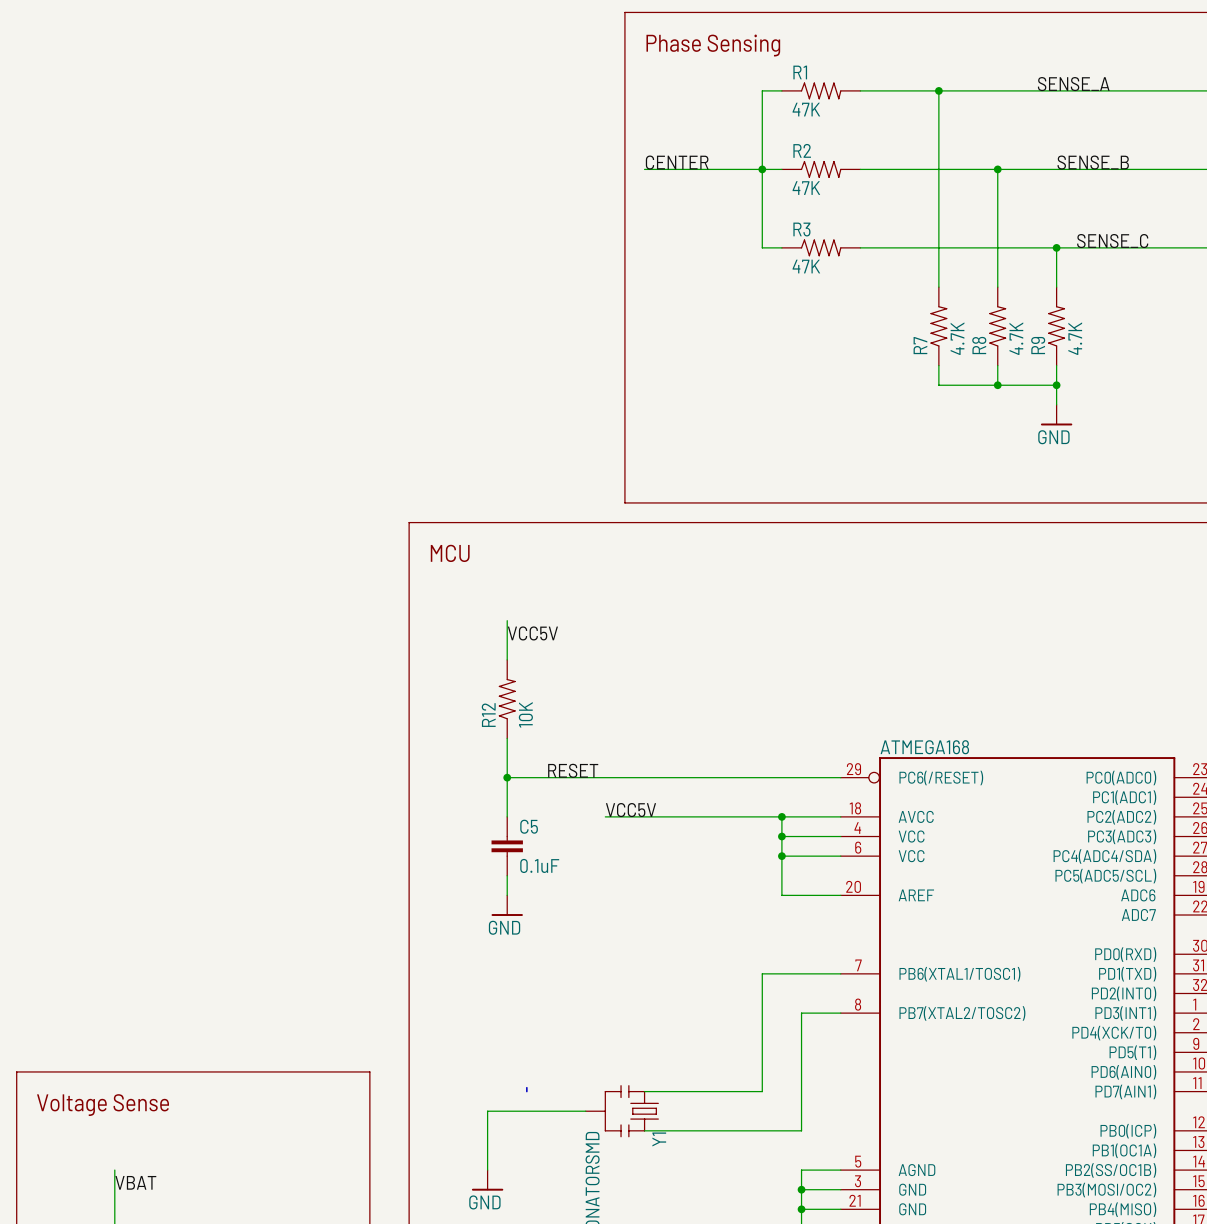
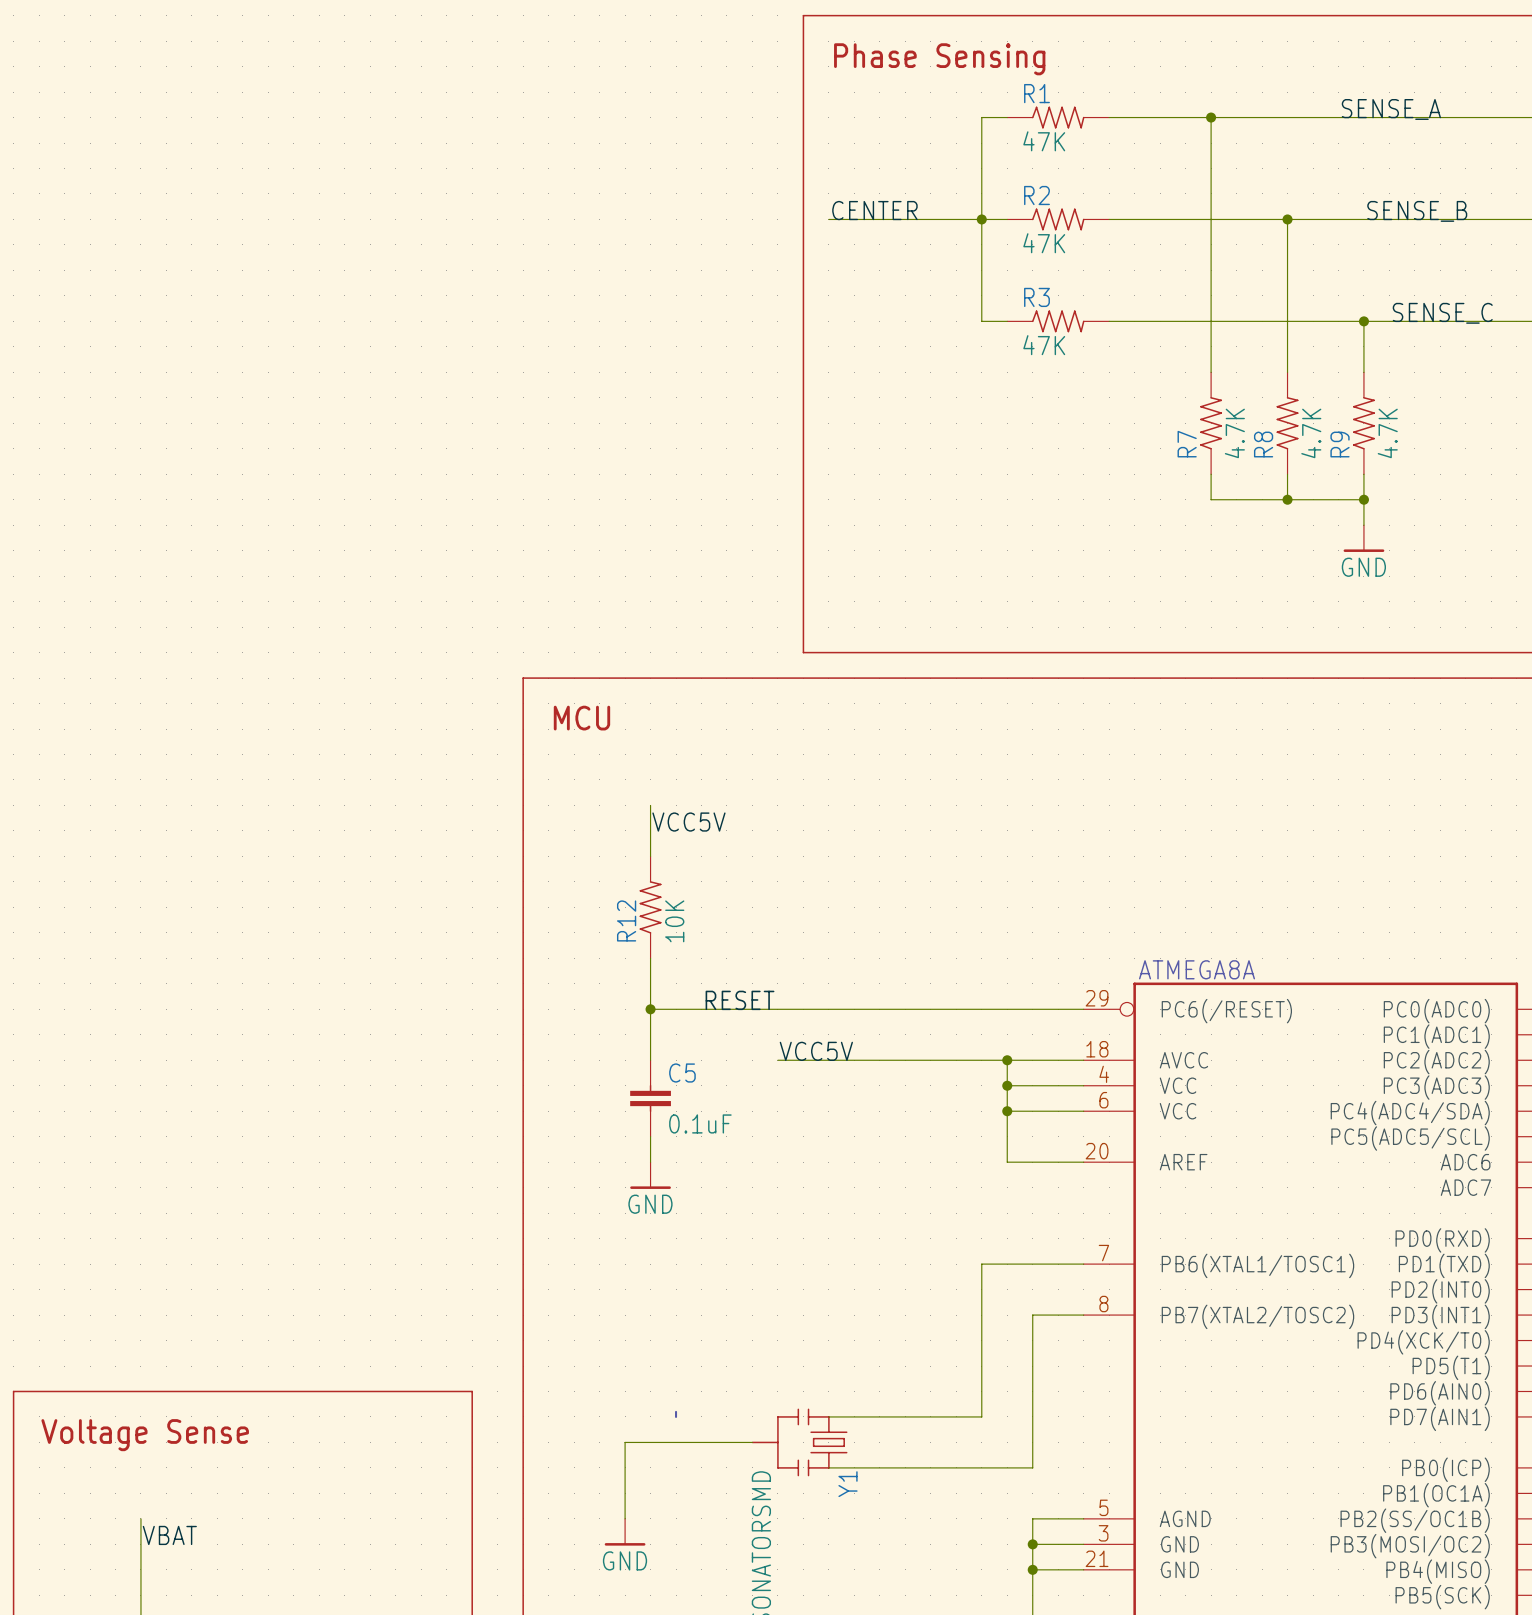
part value: ATMEGA168 (924, 747) -> none
text: none -> ATMEGA8A (1196, 969)

